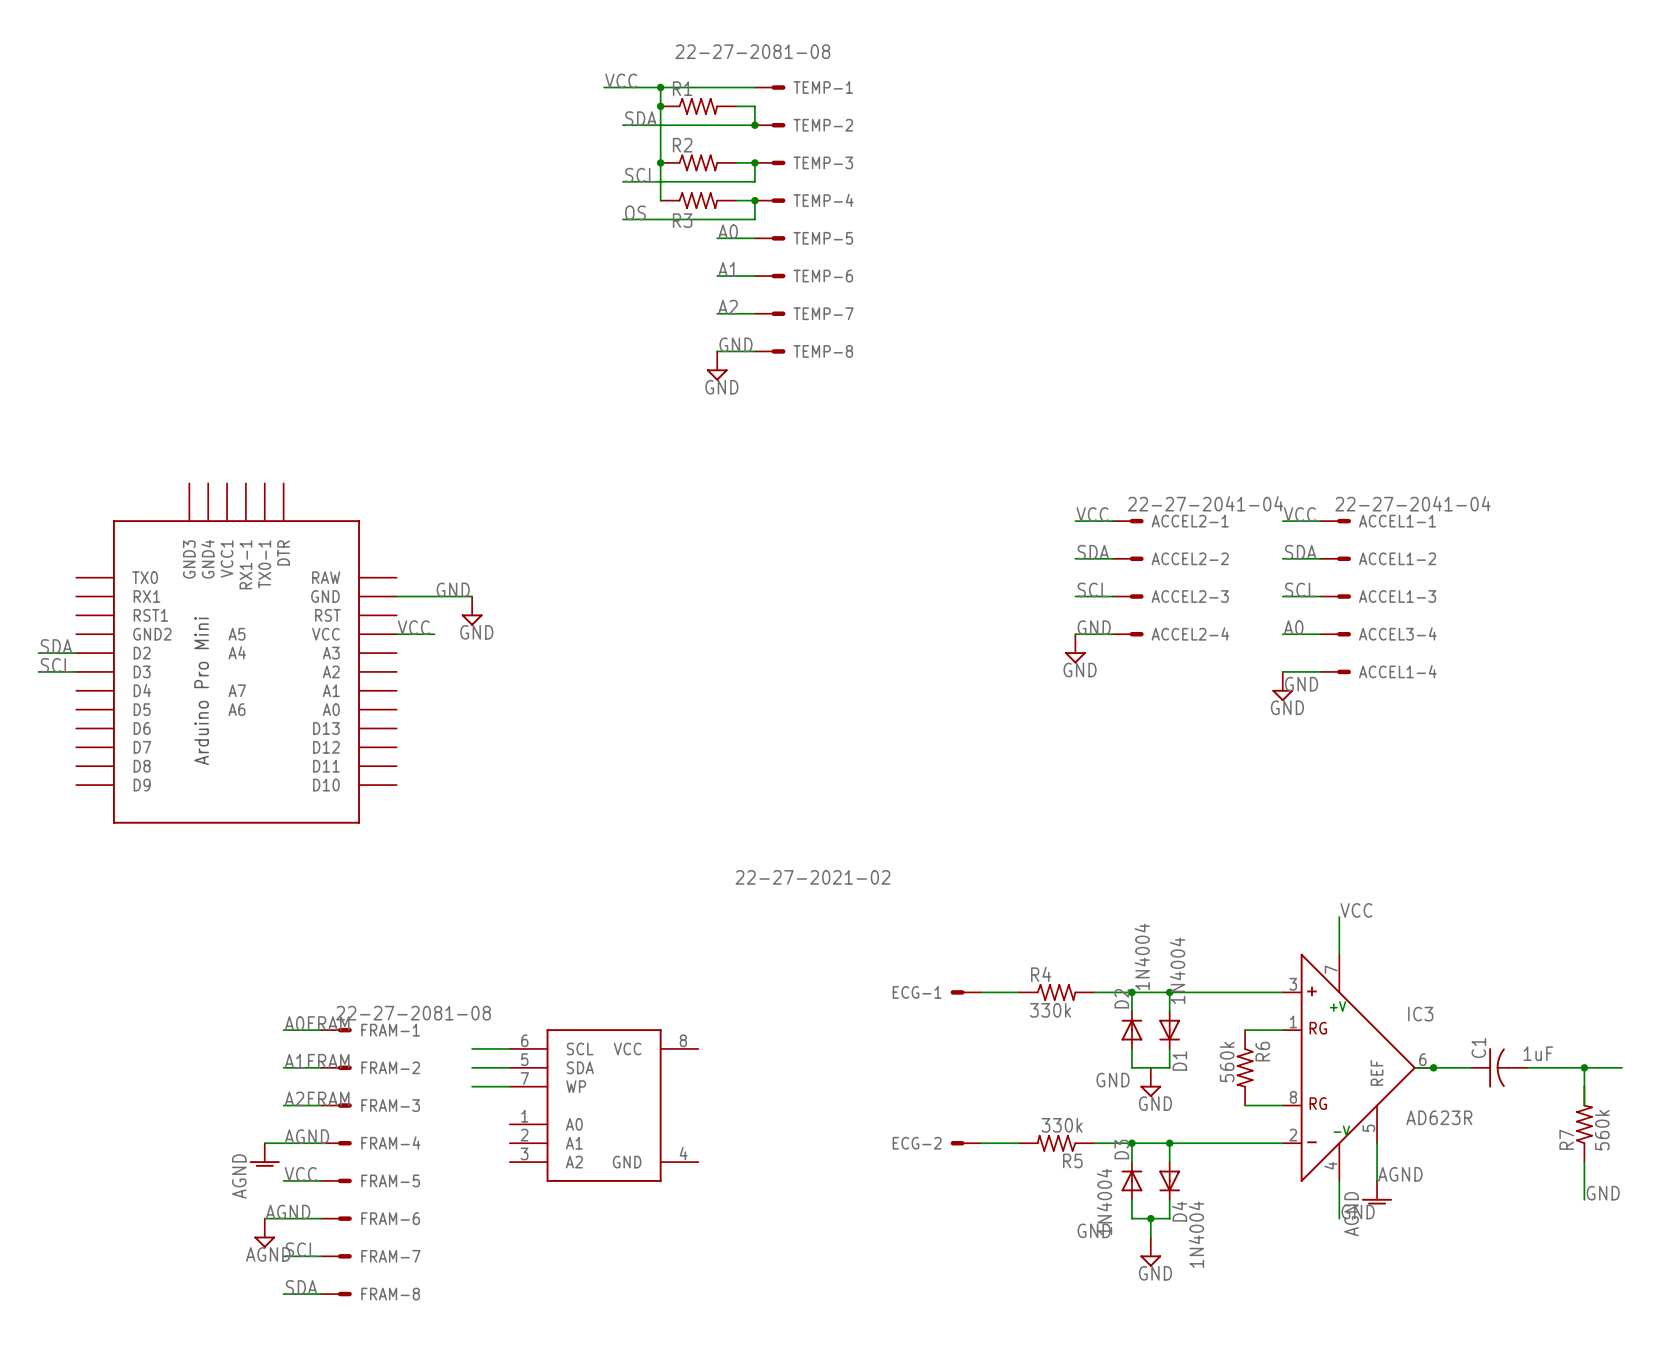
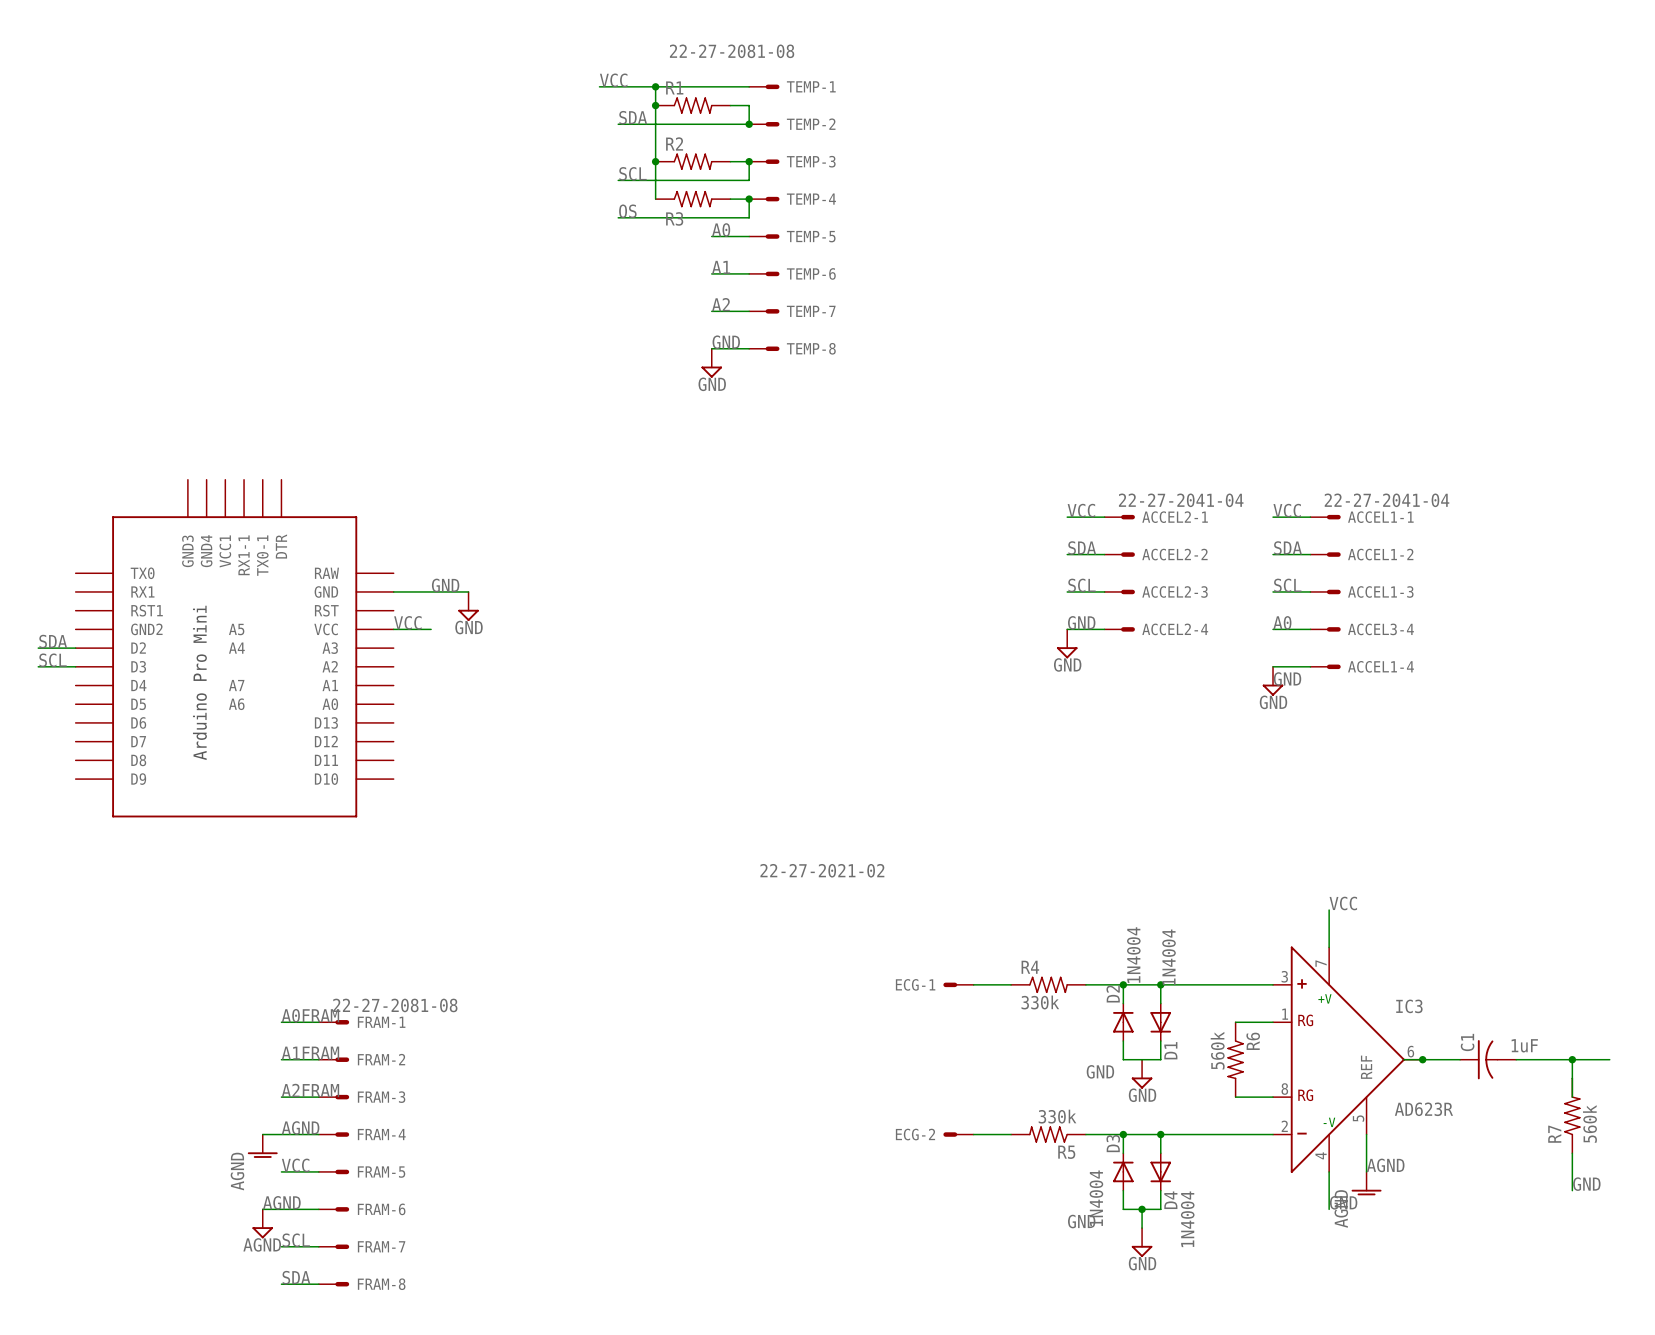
wire: (472, 1048) (509, 1048) -> none
wire: (472, 1067) (509, 1067) -> none
wire: (472, 1086) (509, 1086) -> none
part: (604, 1105) -> none

